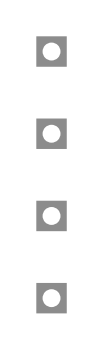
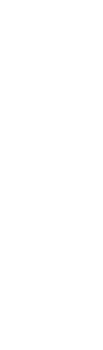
part: (51, 51) -> none
part: (51, 133) -> none
part: (51, 215) -> none
part: (51, 298) -> none

